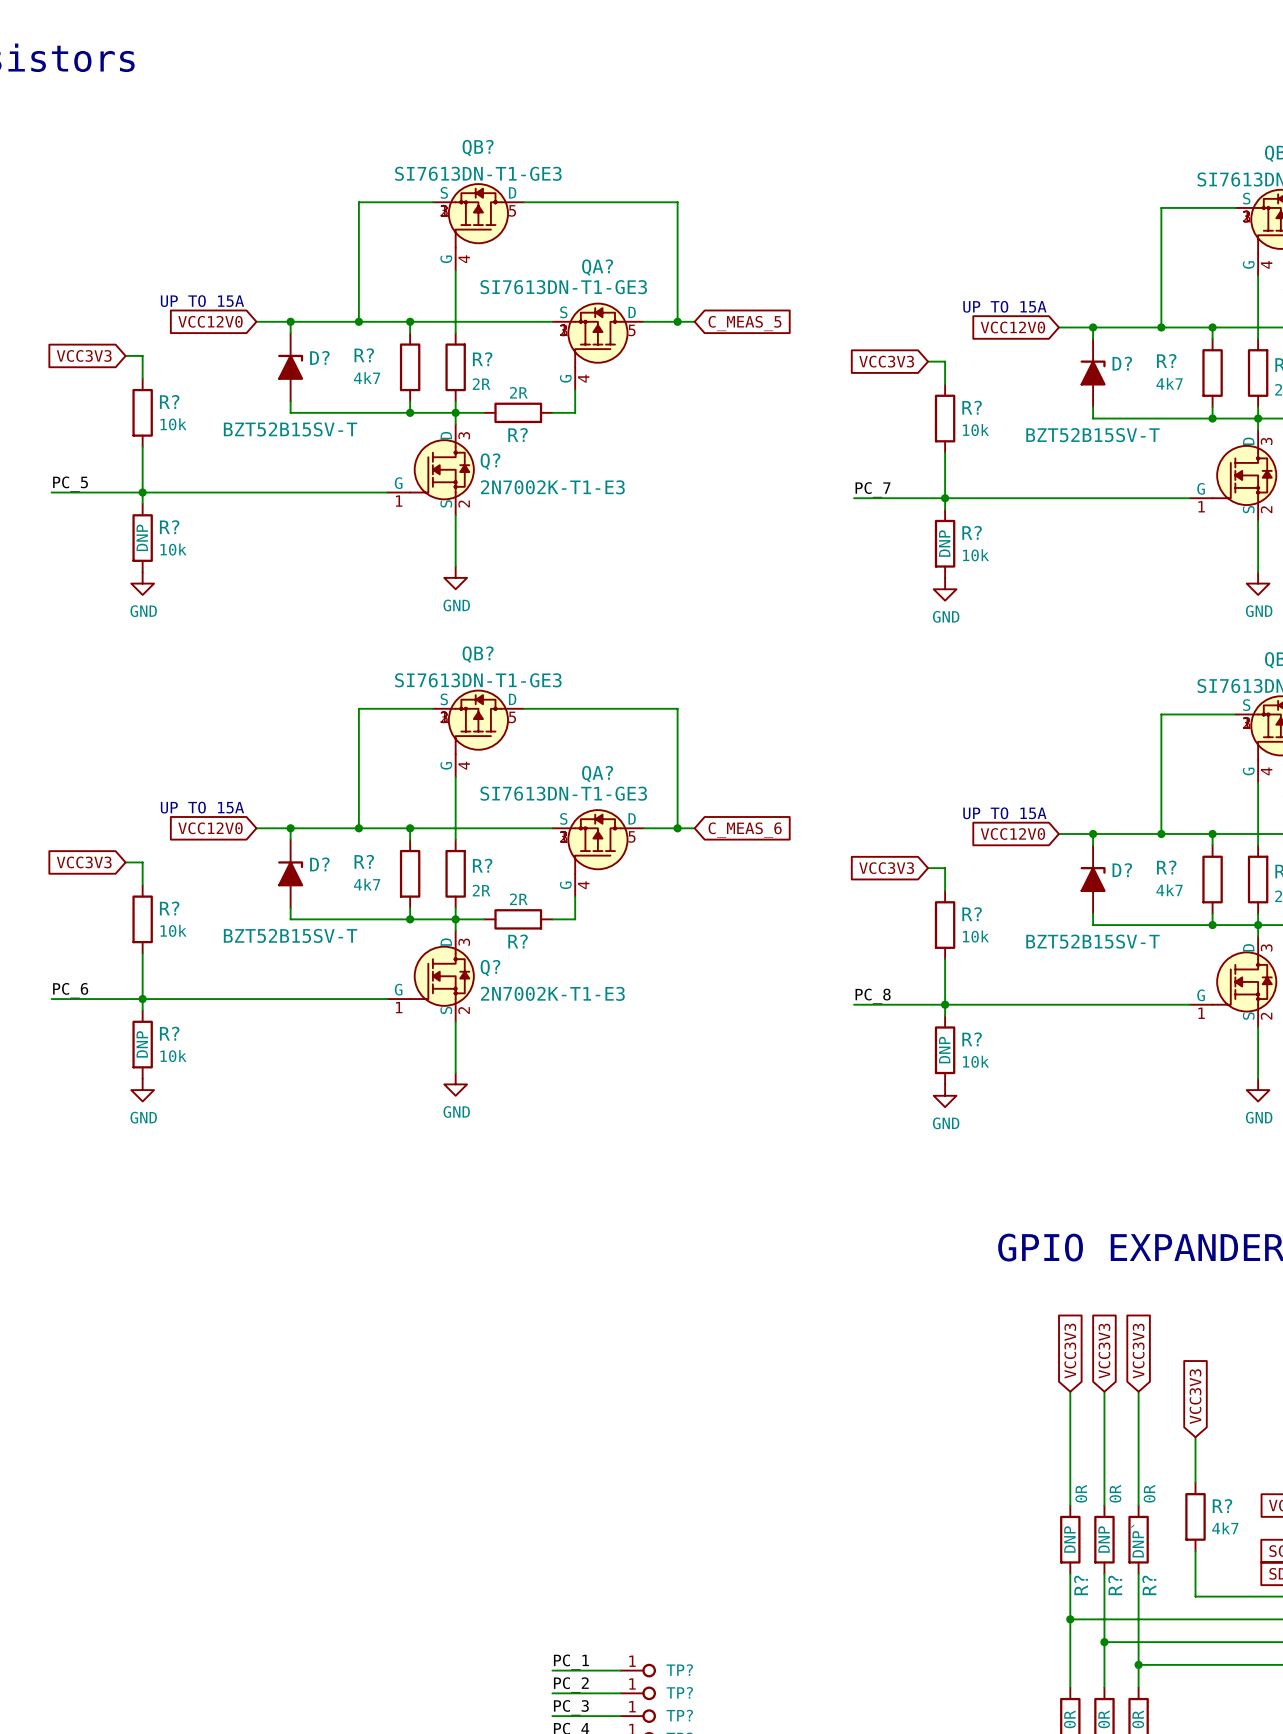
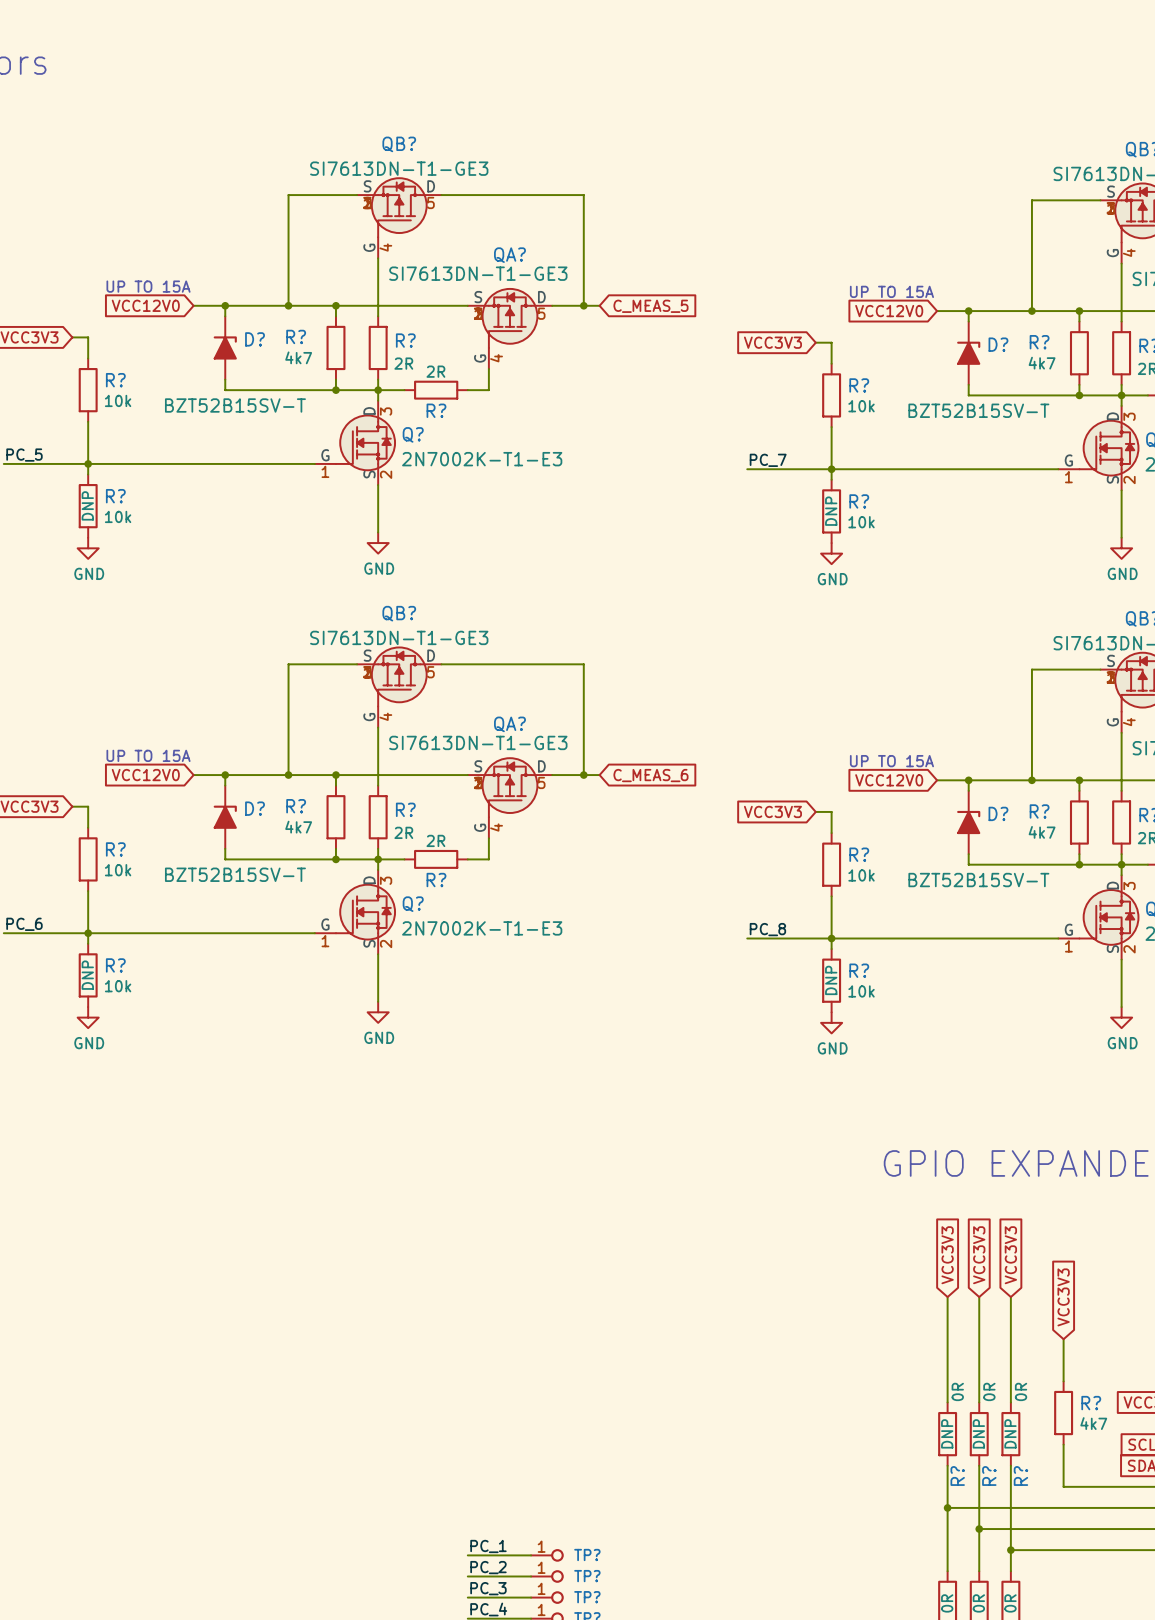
R? text: DNP` (1137, 1540) -> DNP (1010, 1433)

